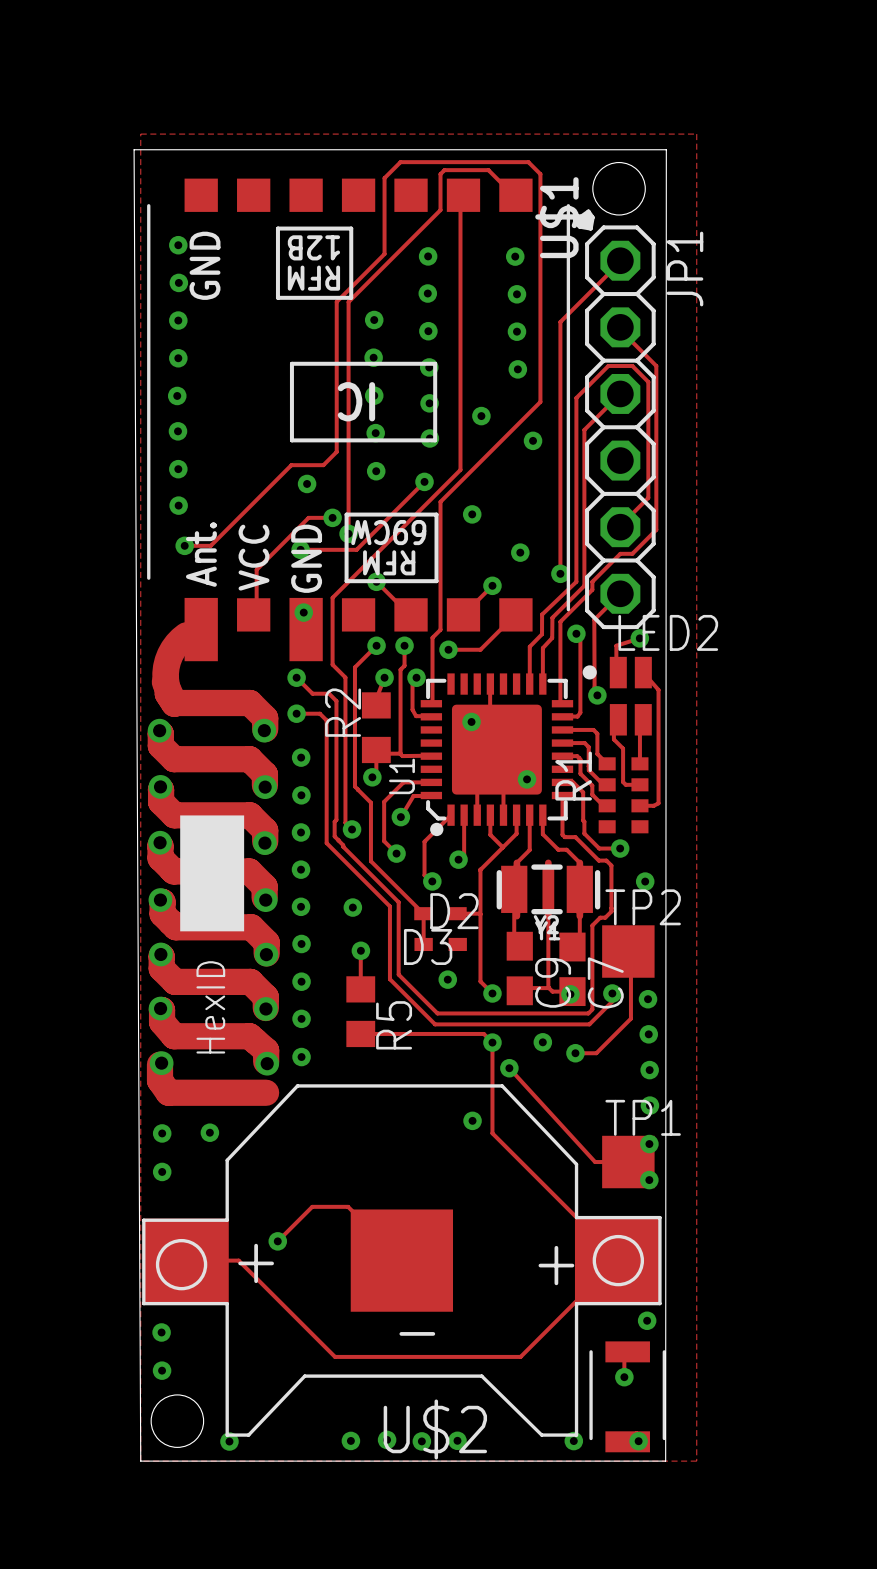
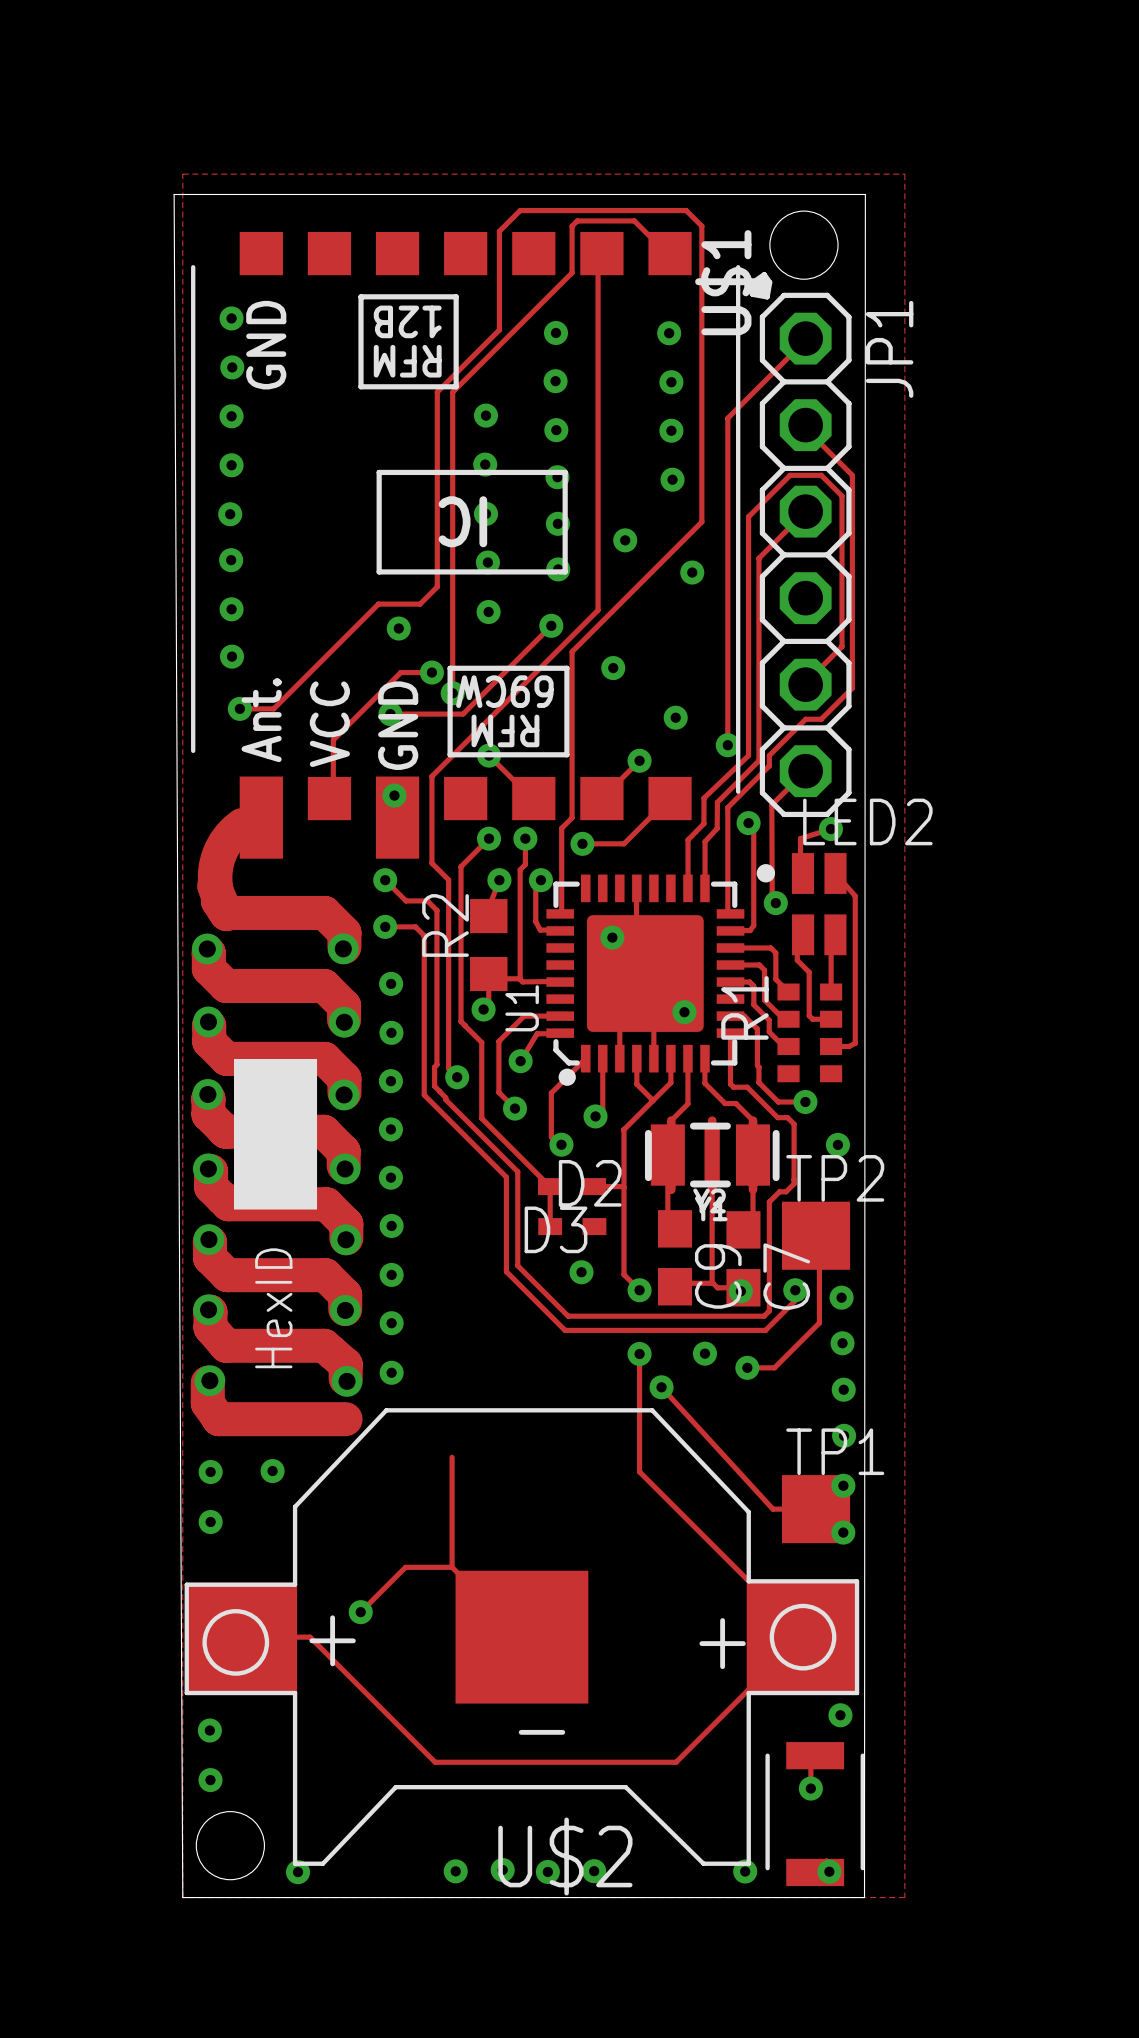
via: (352, 907) -> none
track: (360, 950) (360, 989) -> none
via: (360, 950) -> none
R5: (360, 1011) -> none
track: (360, 1033) (483, 1033) (492, 1042) -> none
via: (472, 1120) -> none
track: none -> (452, 1457) (452, 1567)

